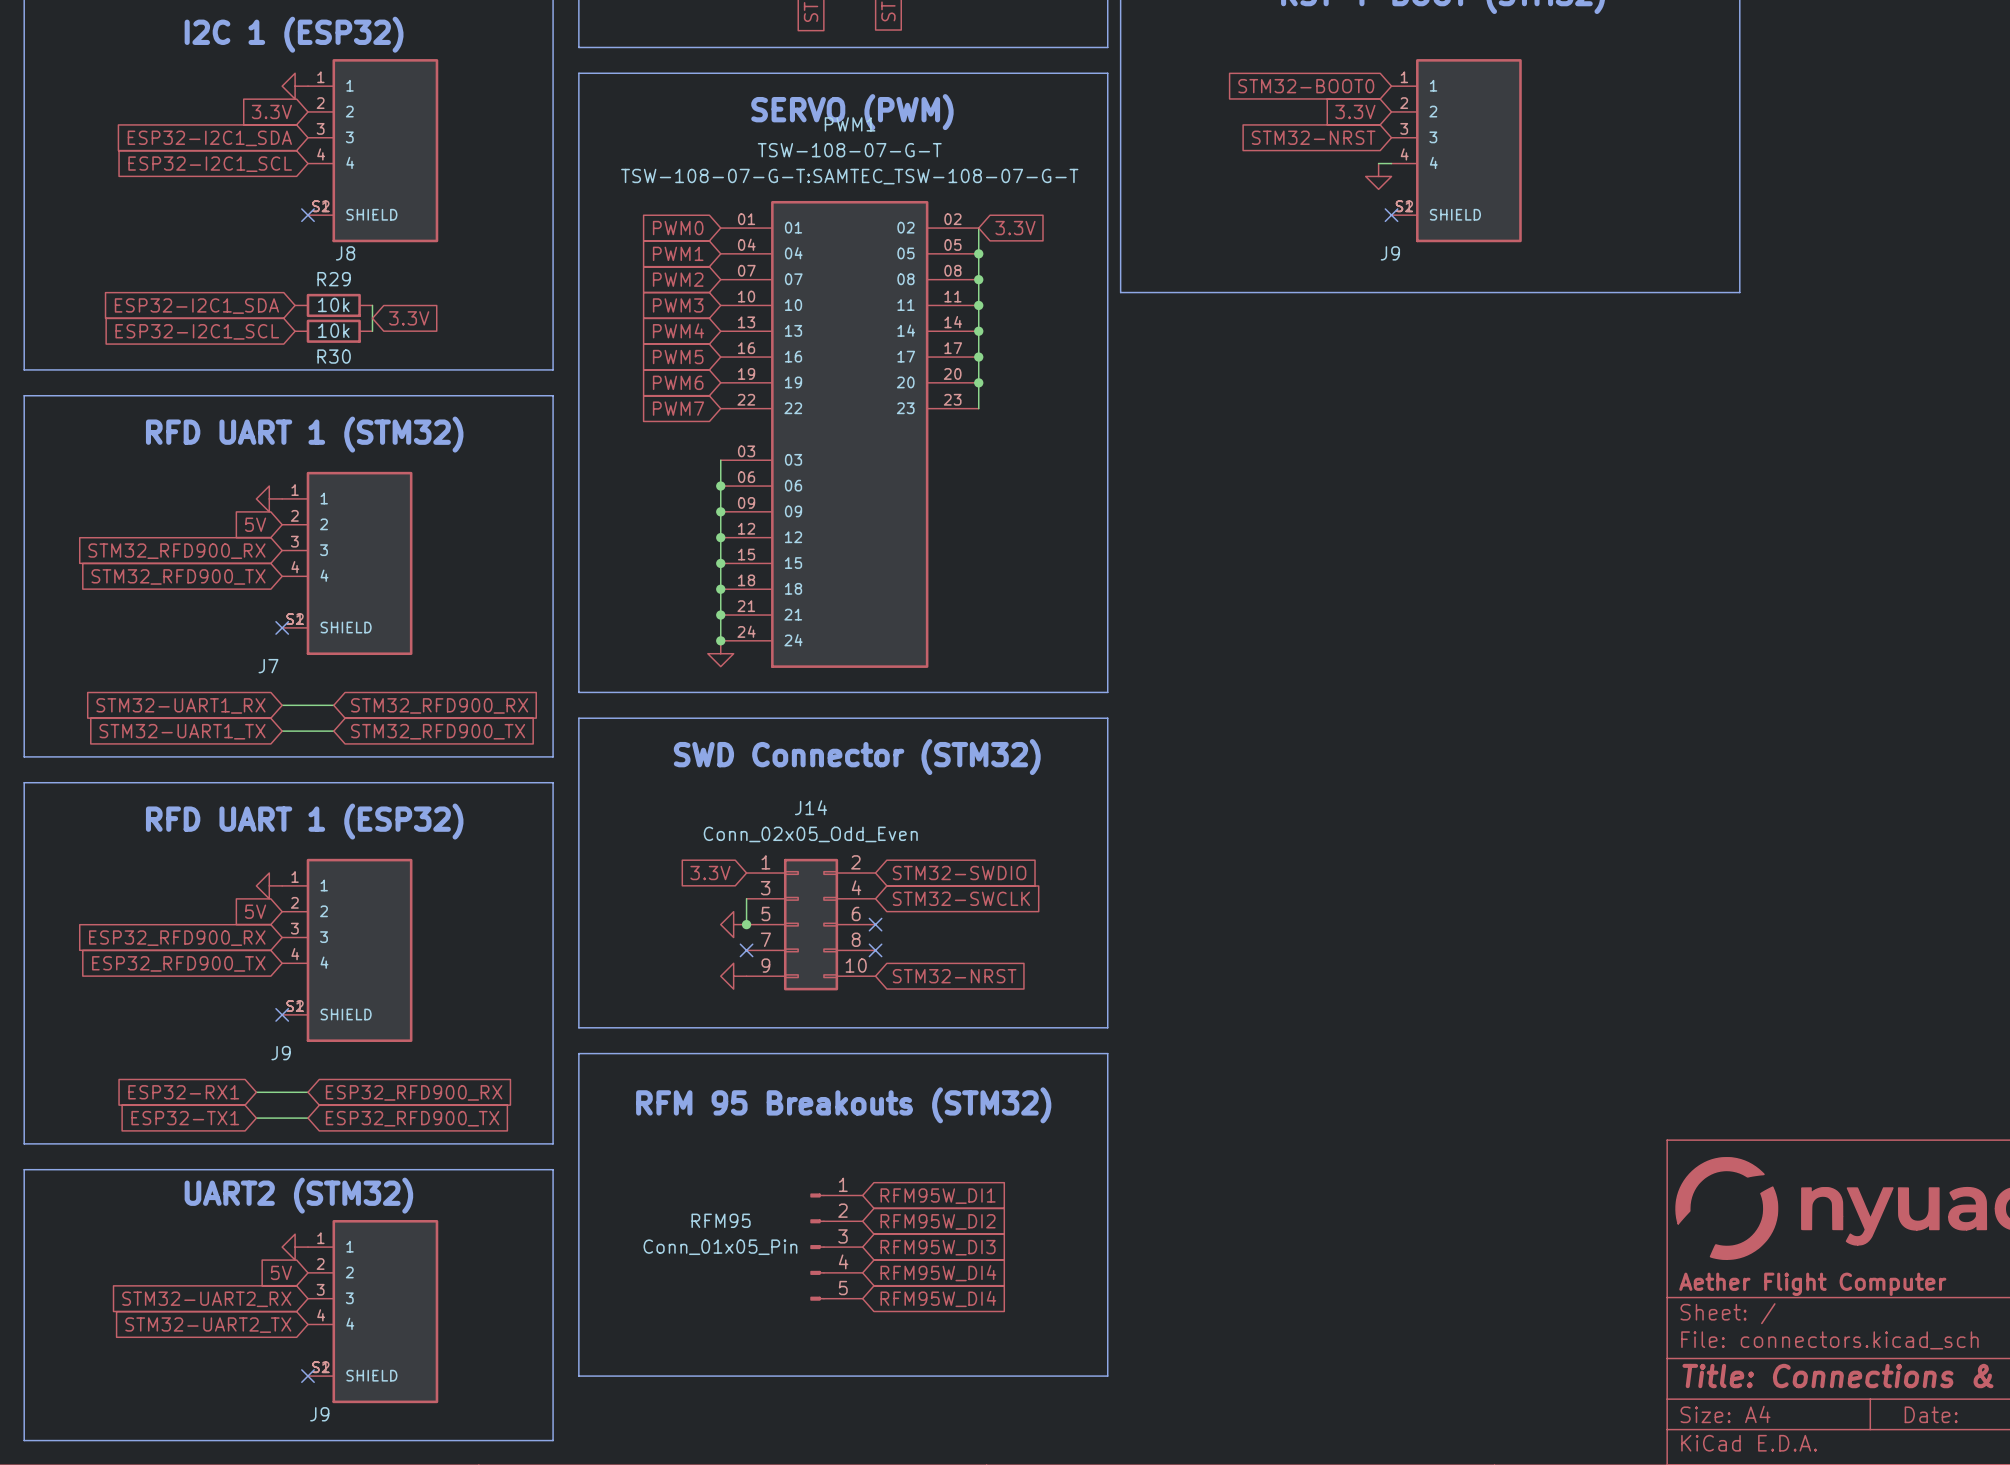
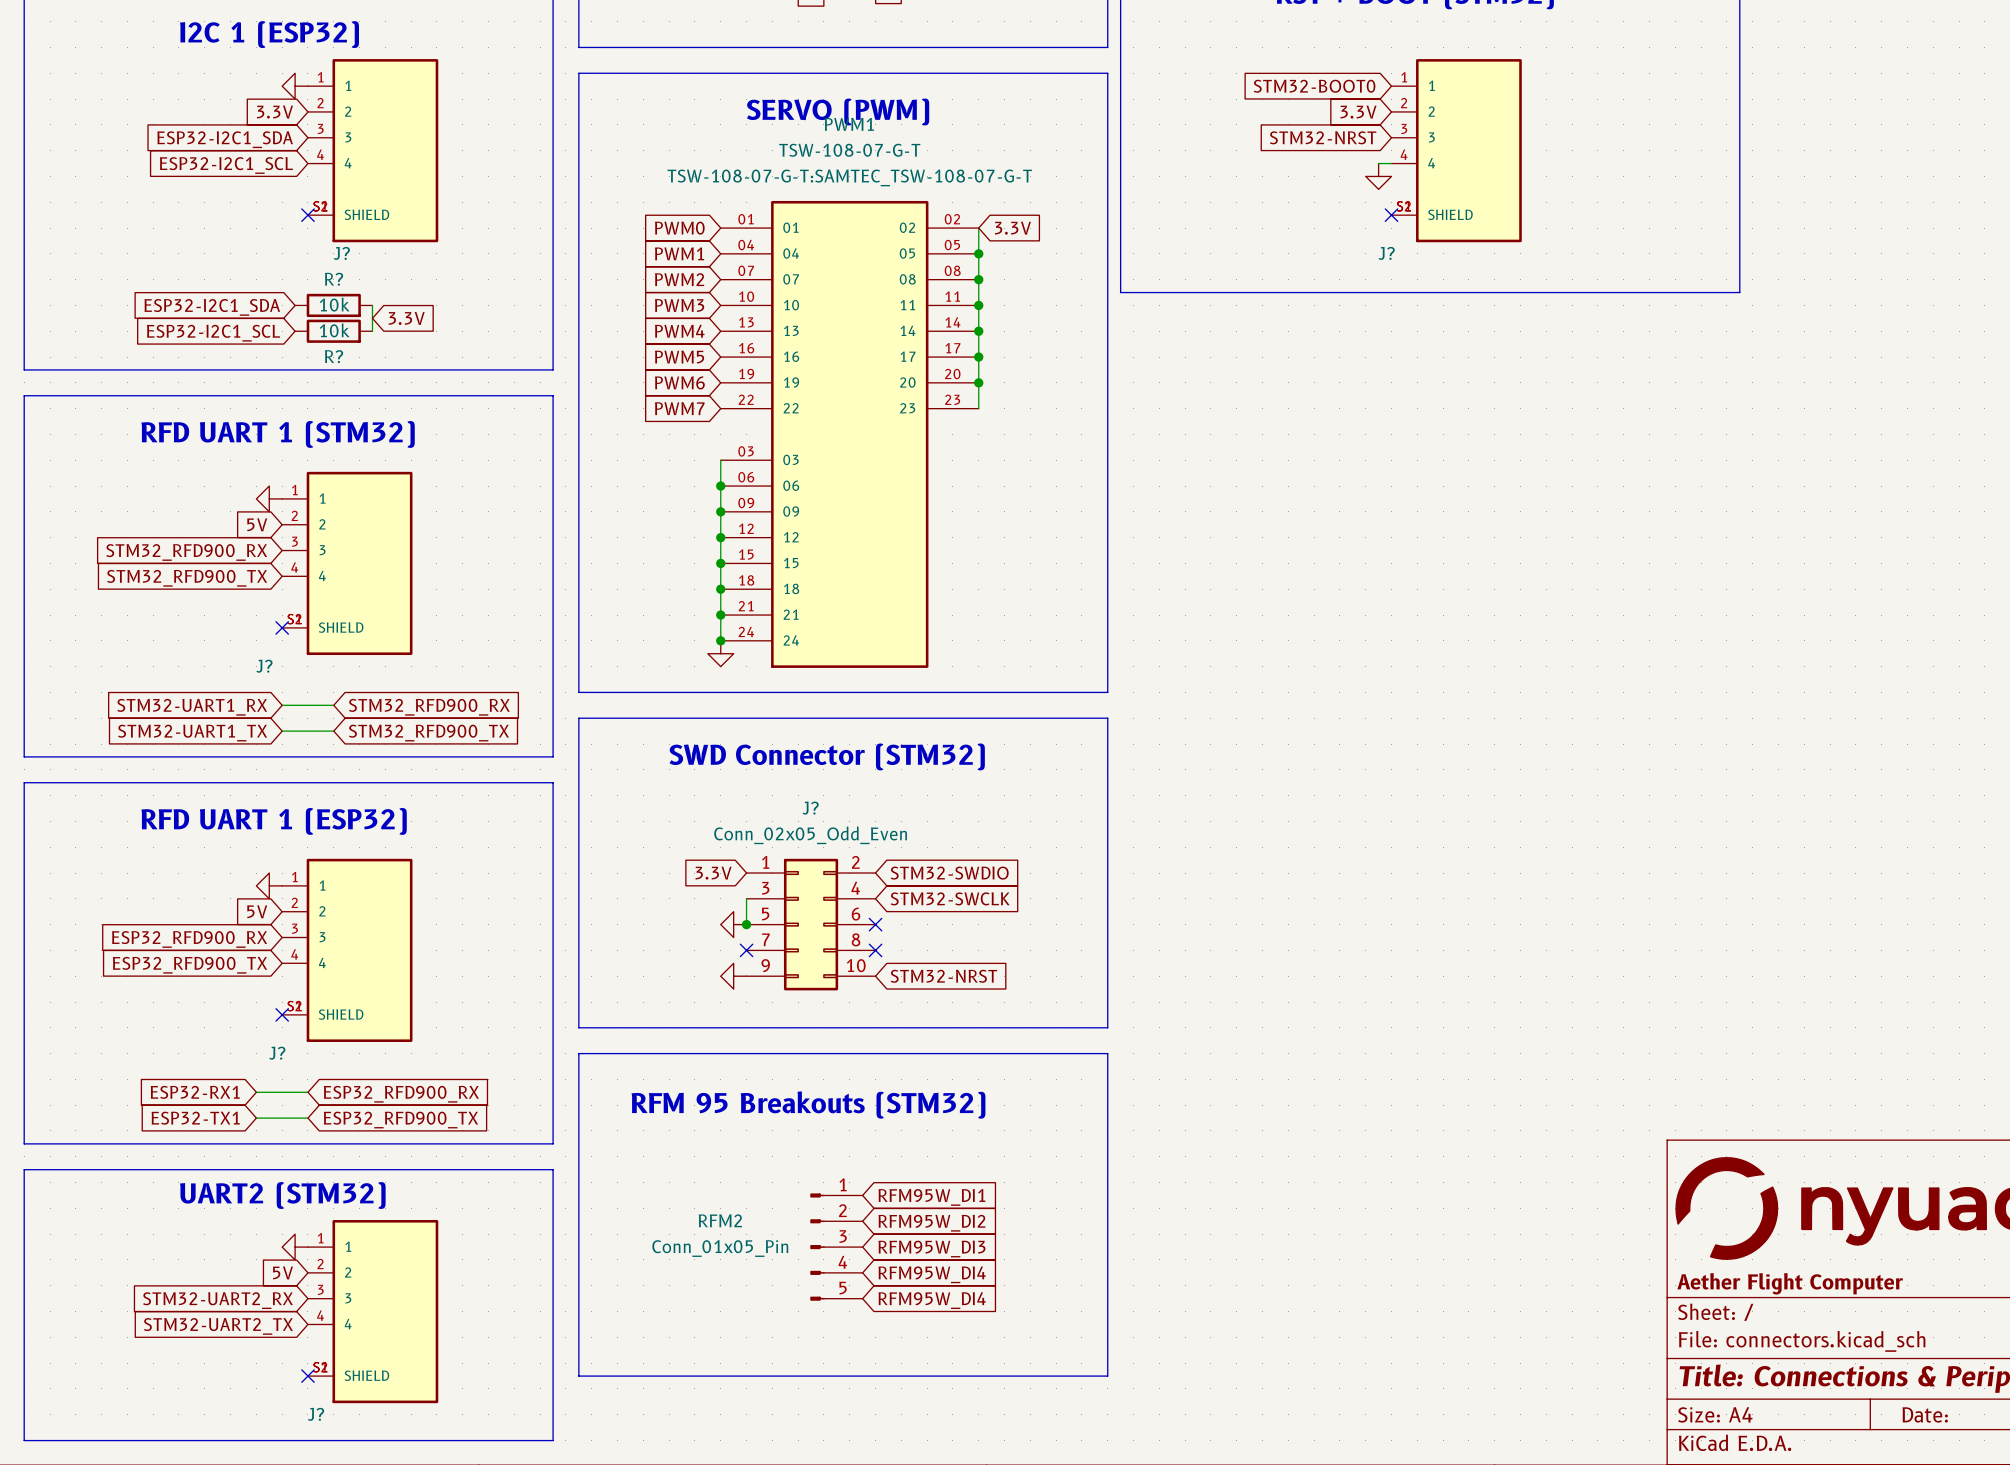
J8 name: J8 (345, 253) -> J? (341, 253)
J9 name: J9 (1390, 253) -> J? (1386, 253)
R29 name: R29 (334, 279) -> R? (334, 279)
R30 name: R30 (334, 356) -> R? (334, 356)
J7 name: J7 (268, 666) -> J? (264, 666)
J14 name: J14 (811, 807) -> J? (810, 808)
J9 name: J9 (281, 1053) -> J? (277, 1053)
RFM95 name: RFM95 (721, 1220) -> RFM2 (720, 1220)
J9 name: J9 (319, 1414) -> J? (316, 1414)

